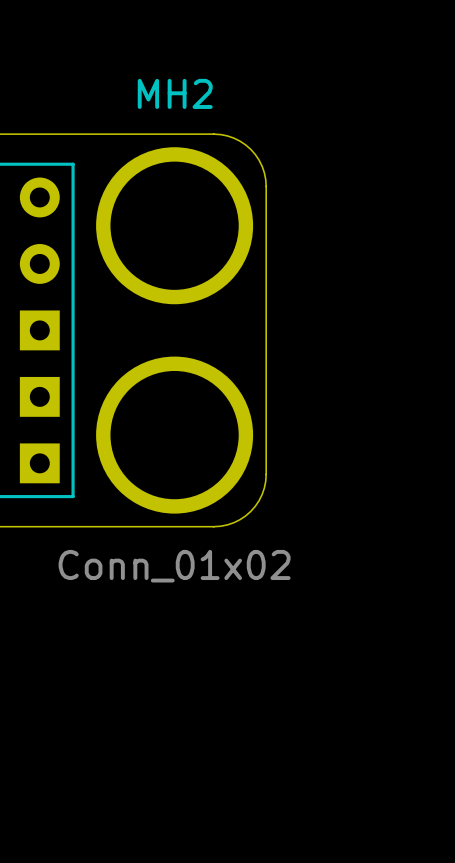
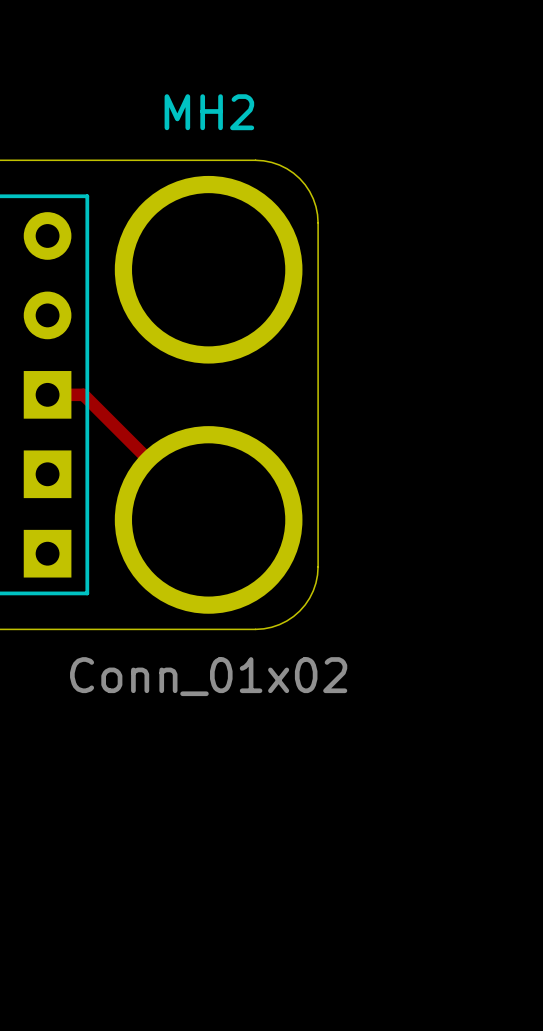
top track: none -> (47, 394) (83, 394) (208, 519)

